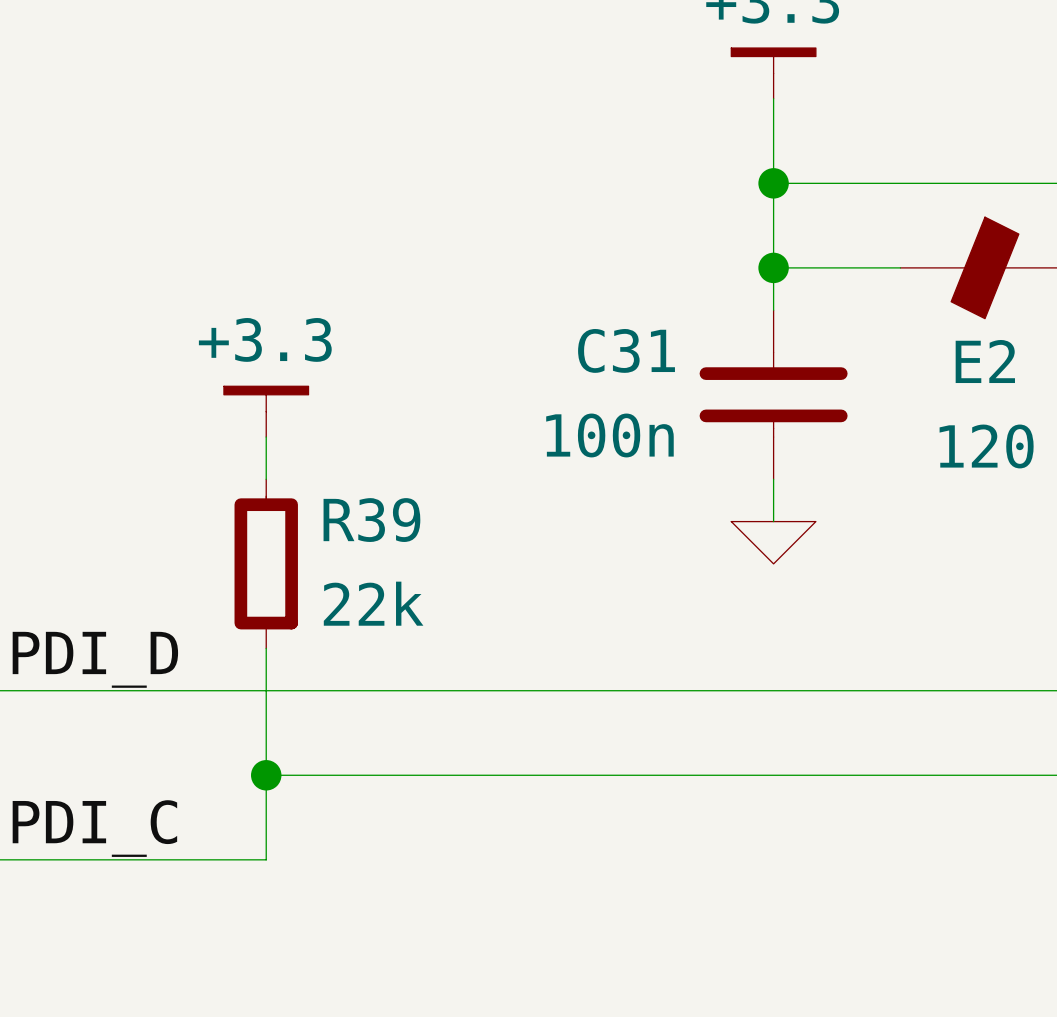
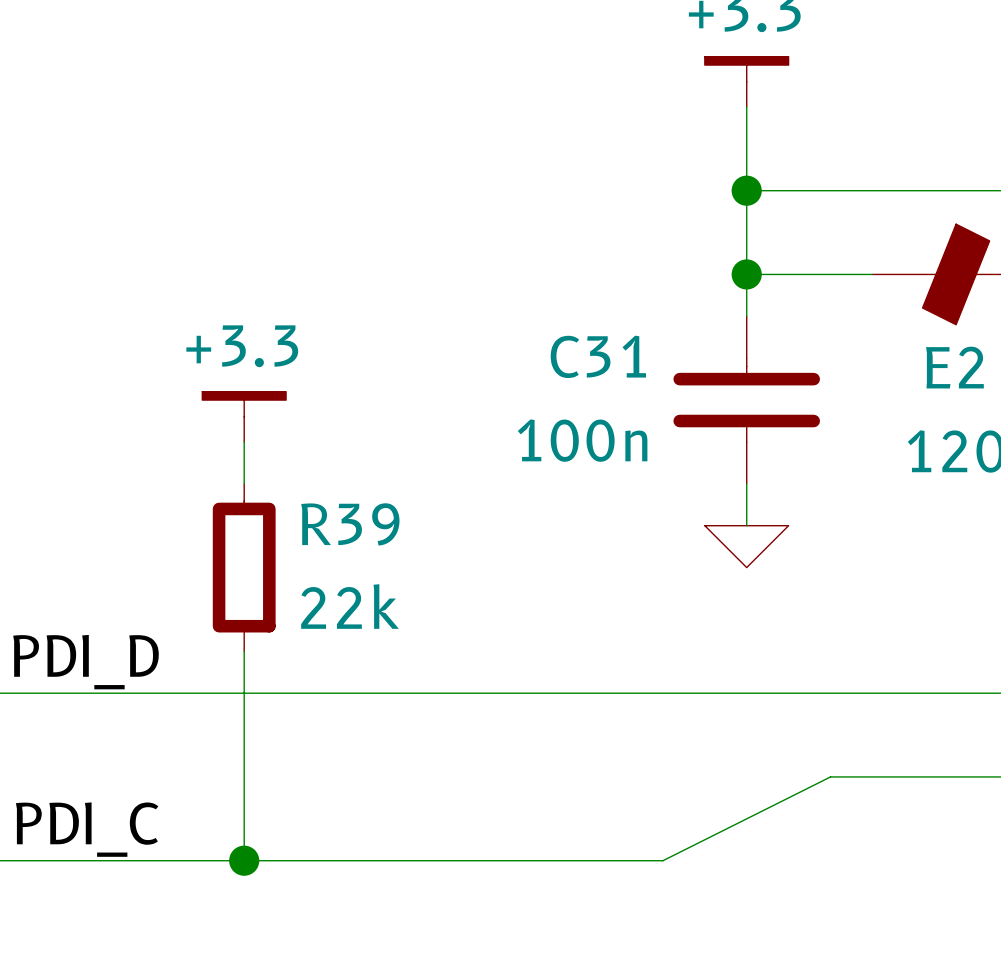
wire: (266, 775) (858, 775) -> (244, 860) (662, 860) (830, 776)
junction position: (266, 775) -> (244, 860)

